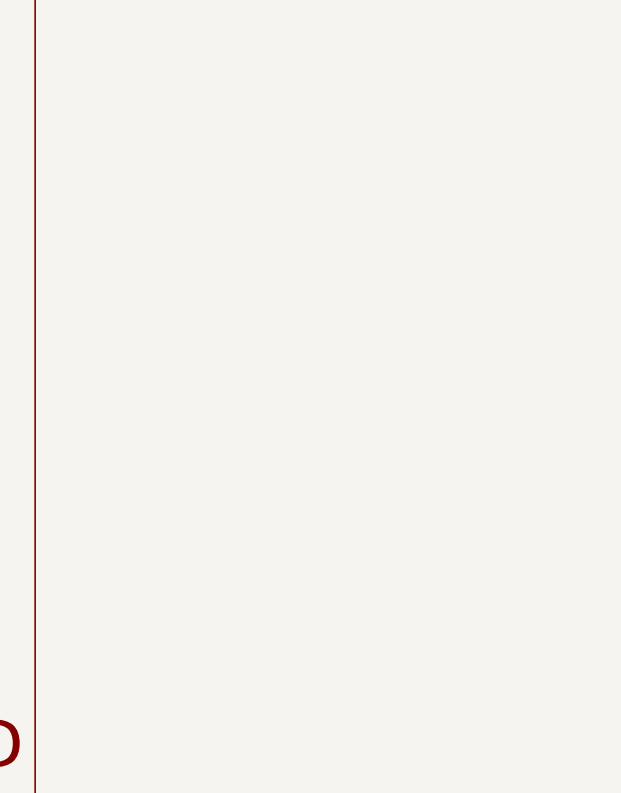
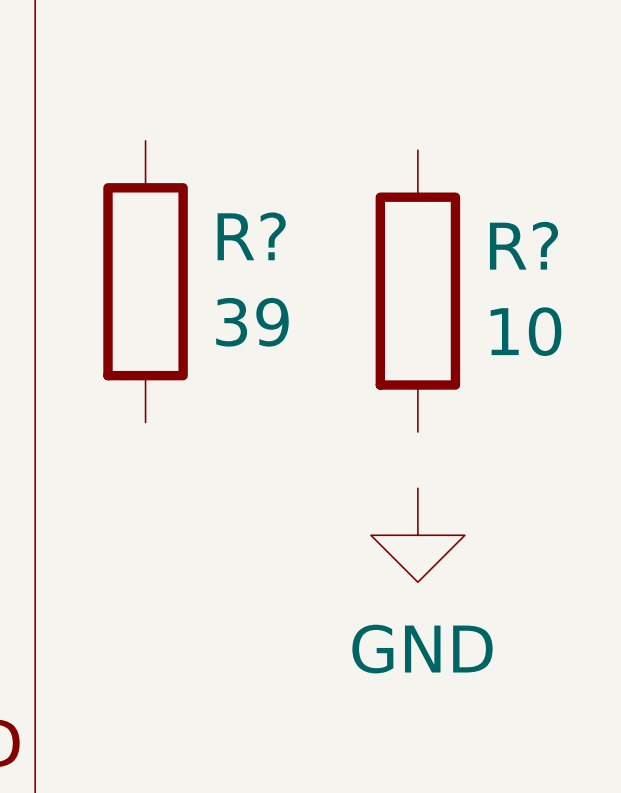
R?: none -> 39 (145, 281)
R?: none -> 10 (417, 291)
power symbol: none -> GND (417, 535)

